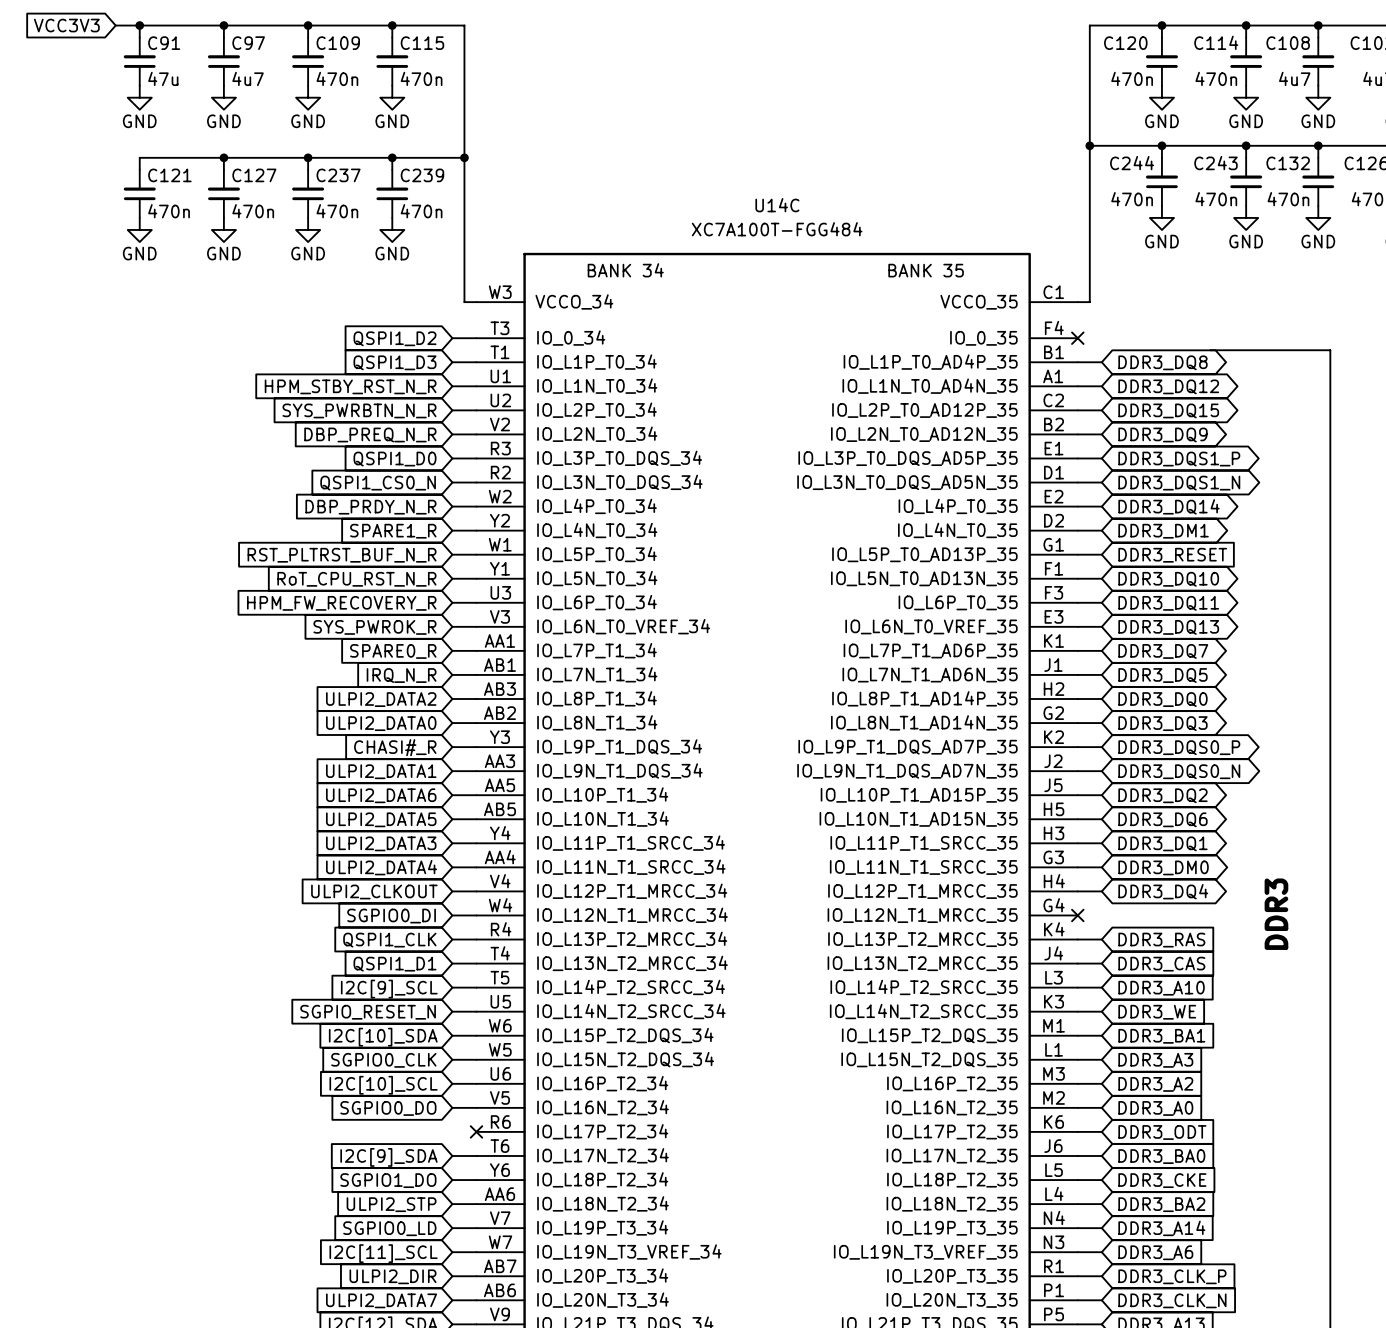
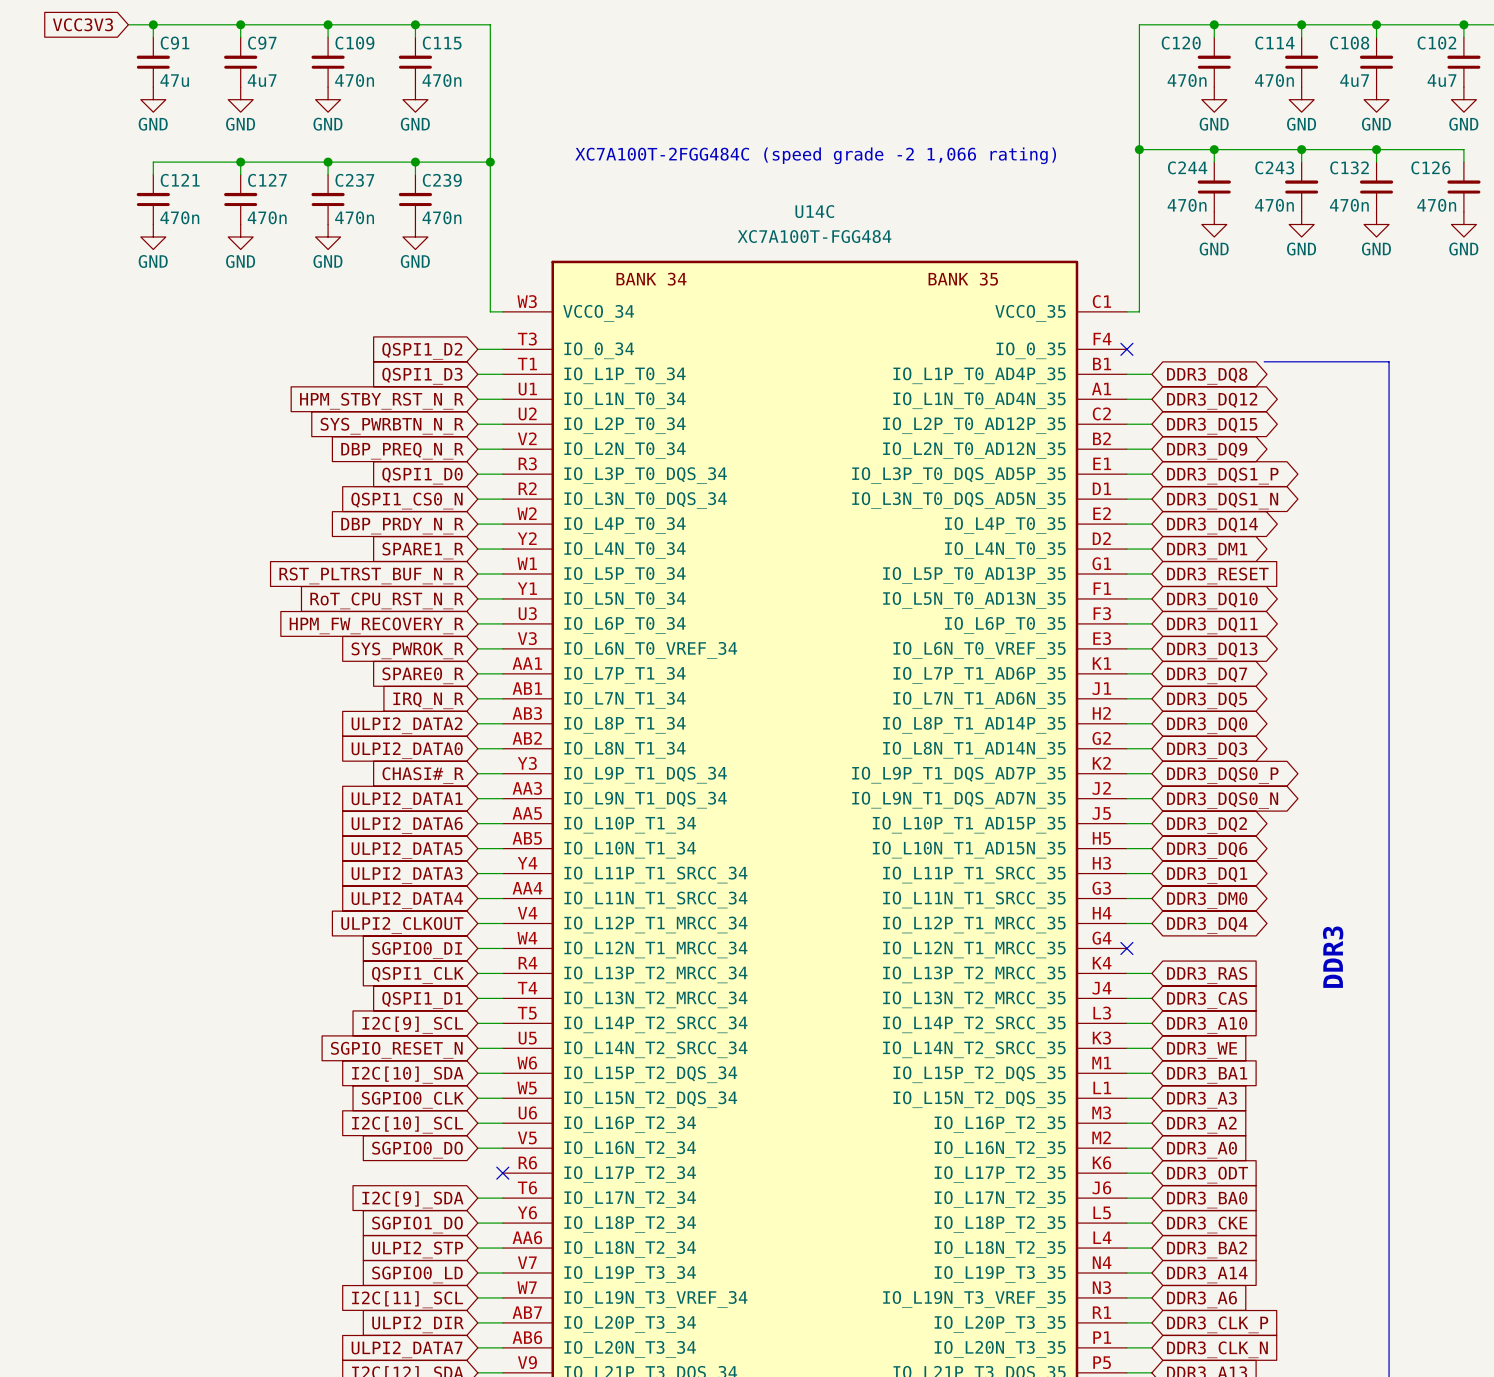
text: none -> XC7A100T-2FGG484C (speed grade -2 1,066 rating) (815, 155)

